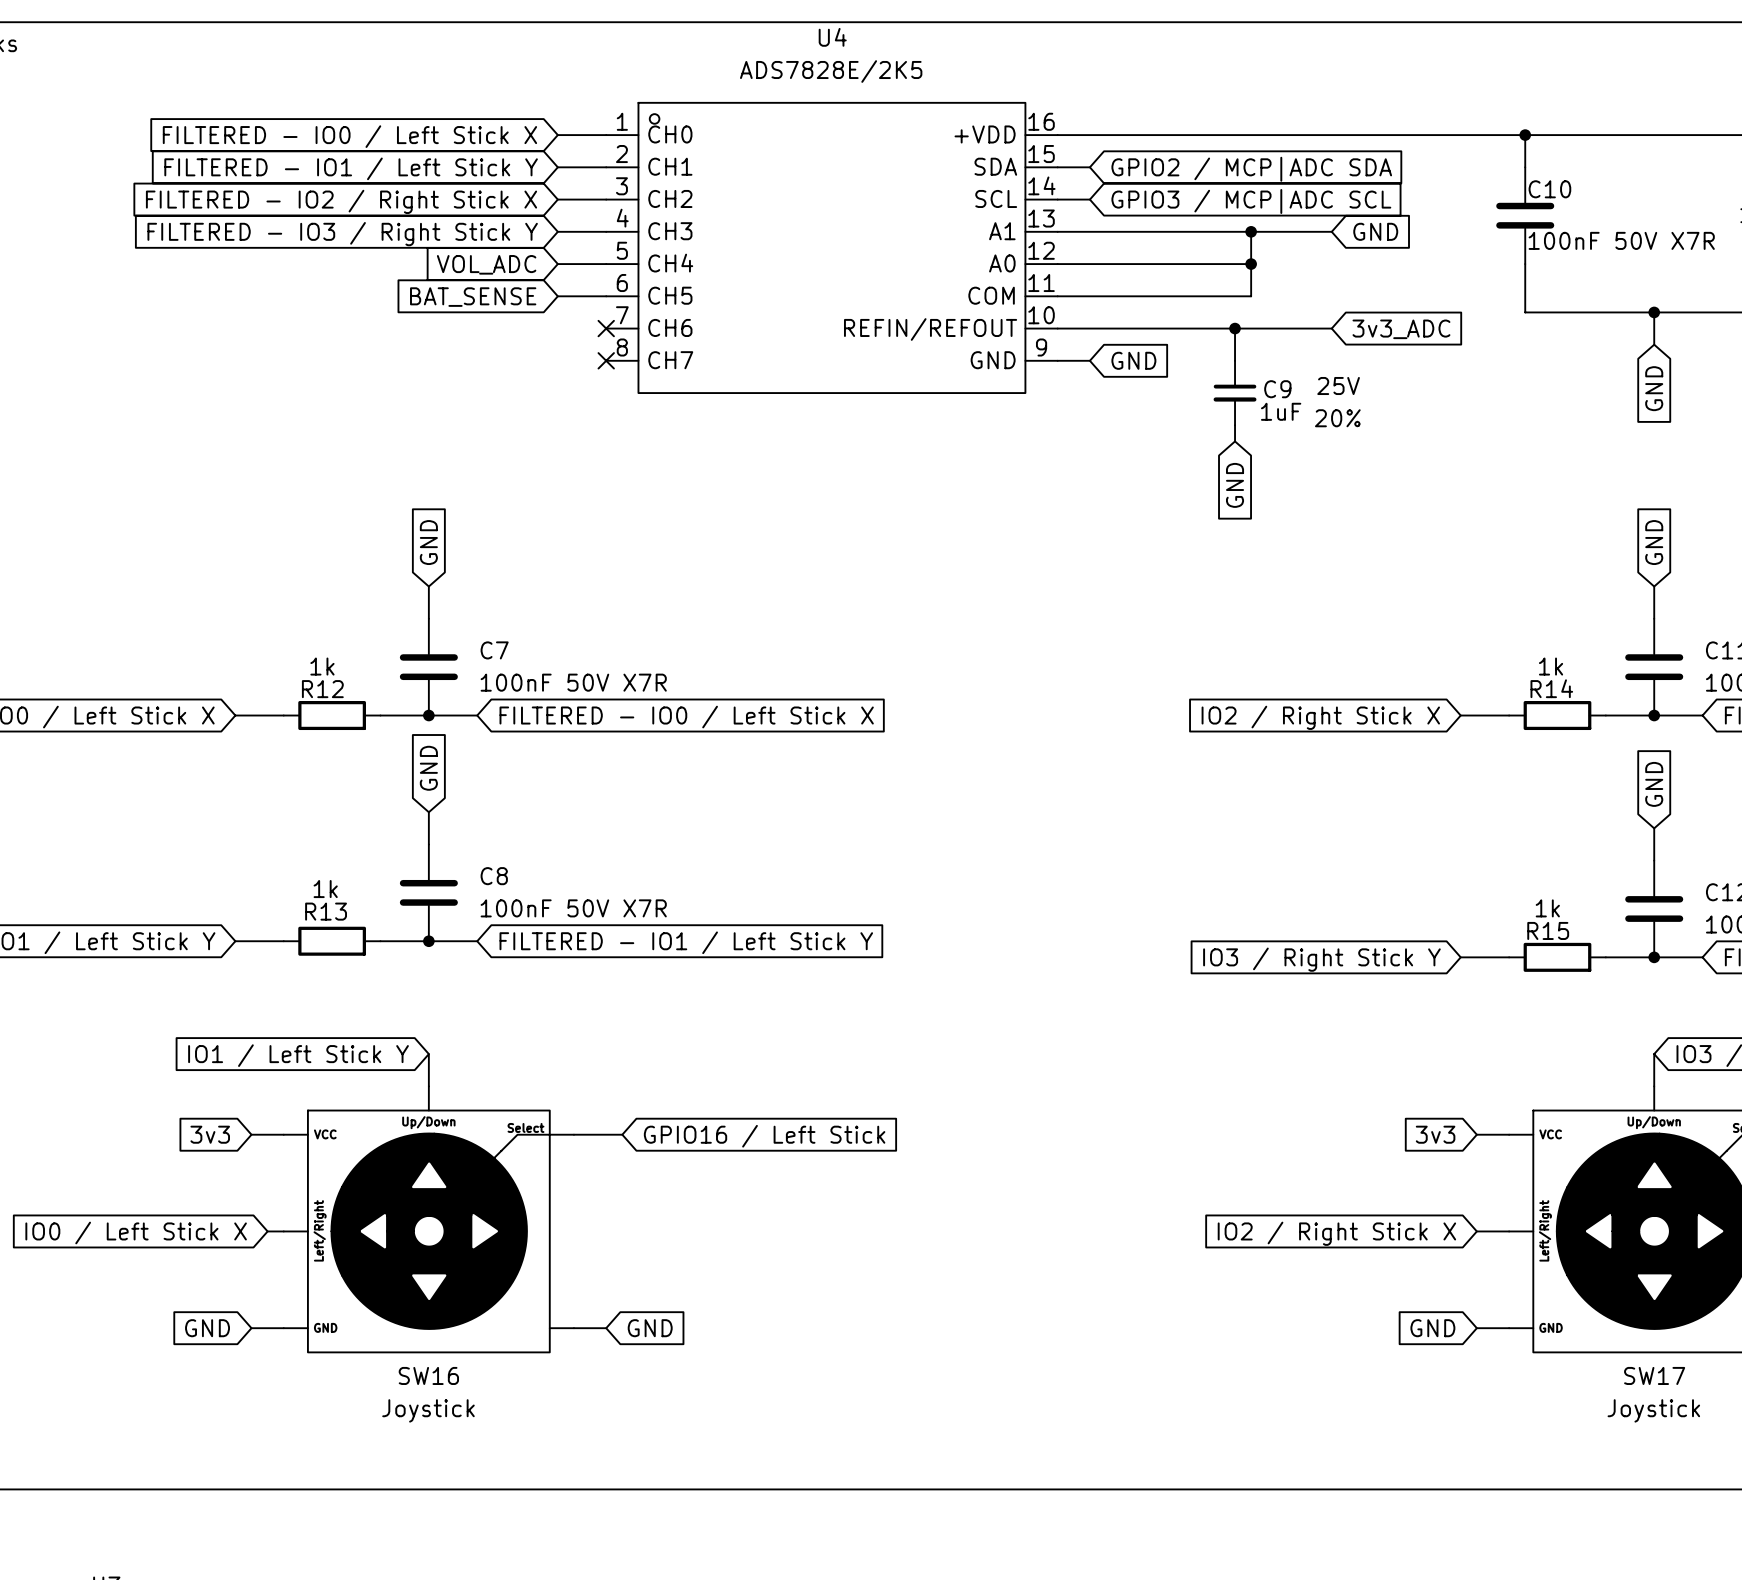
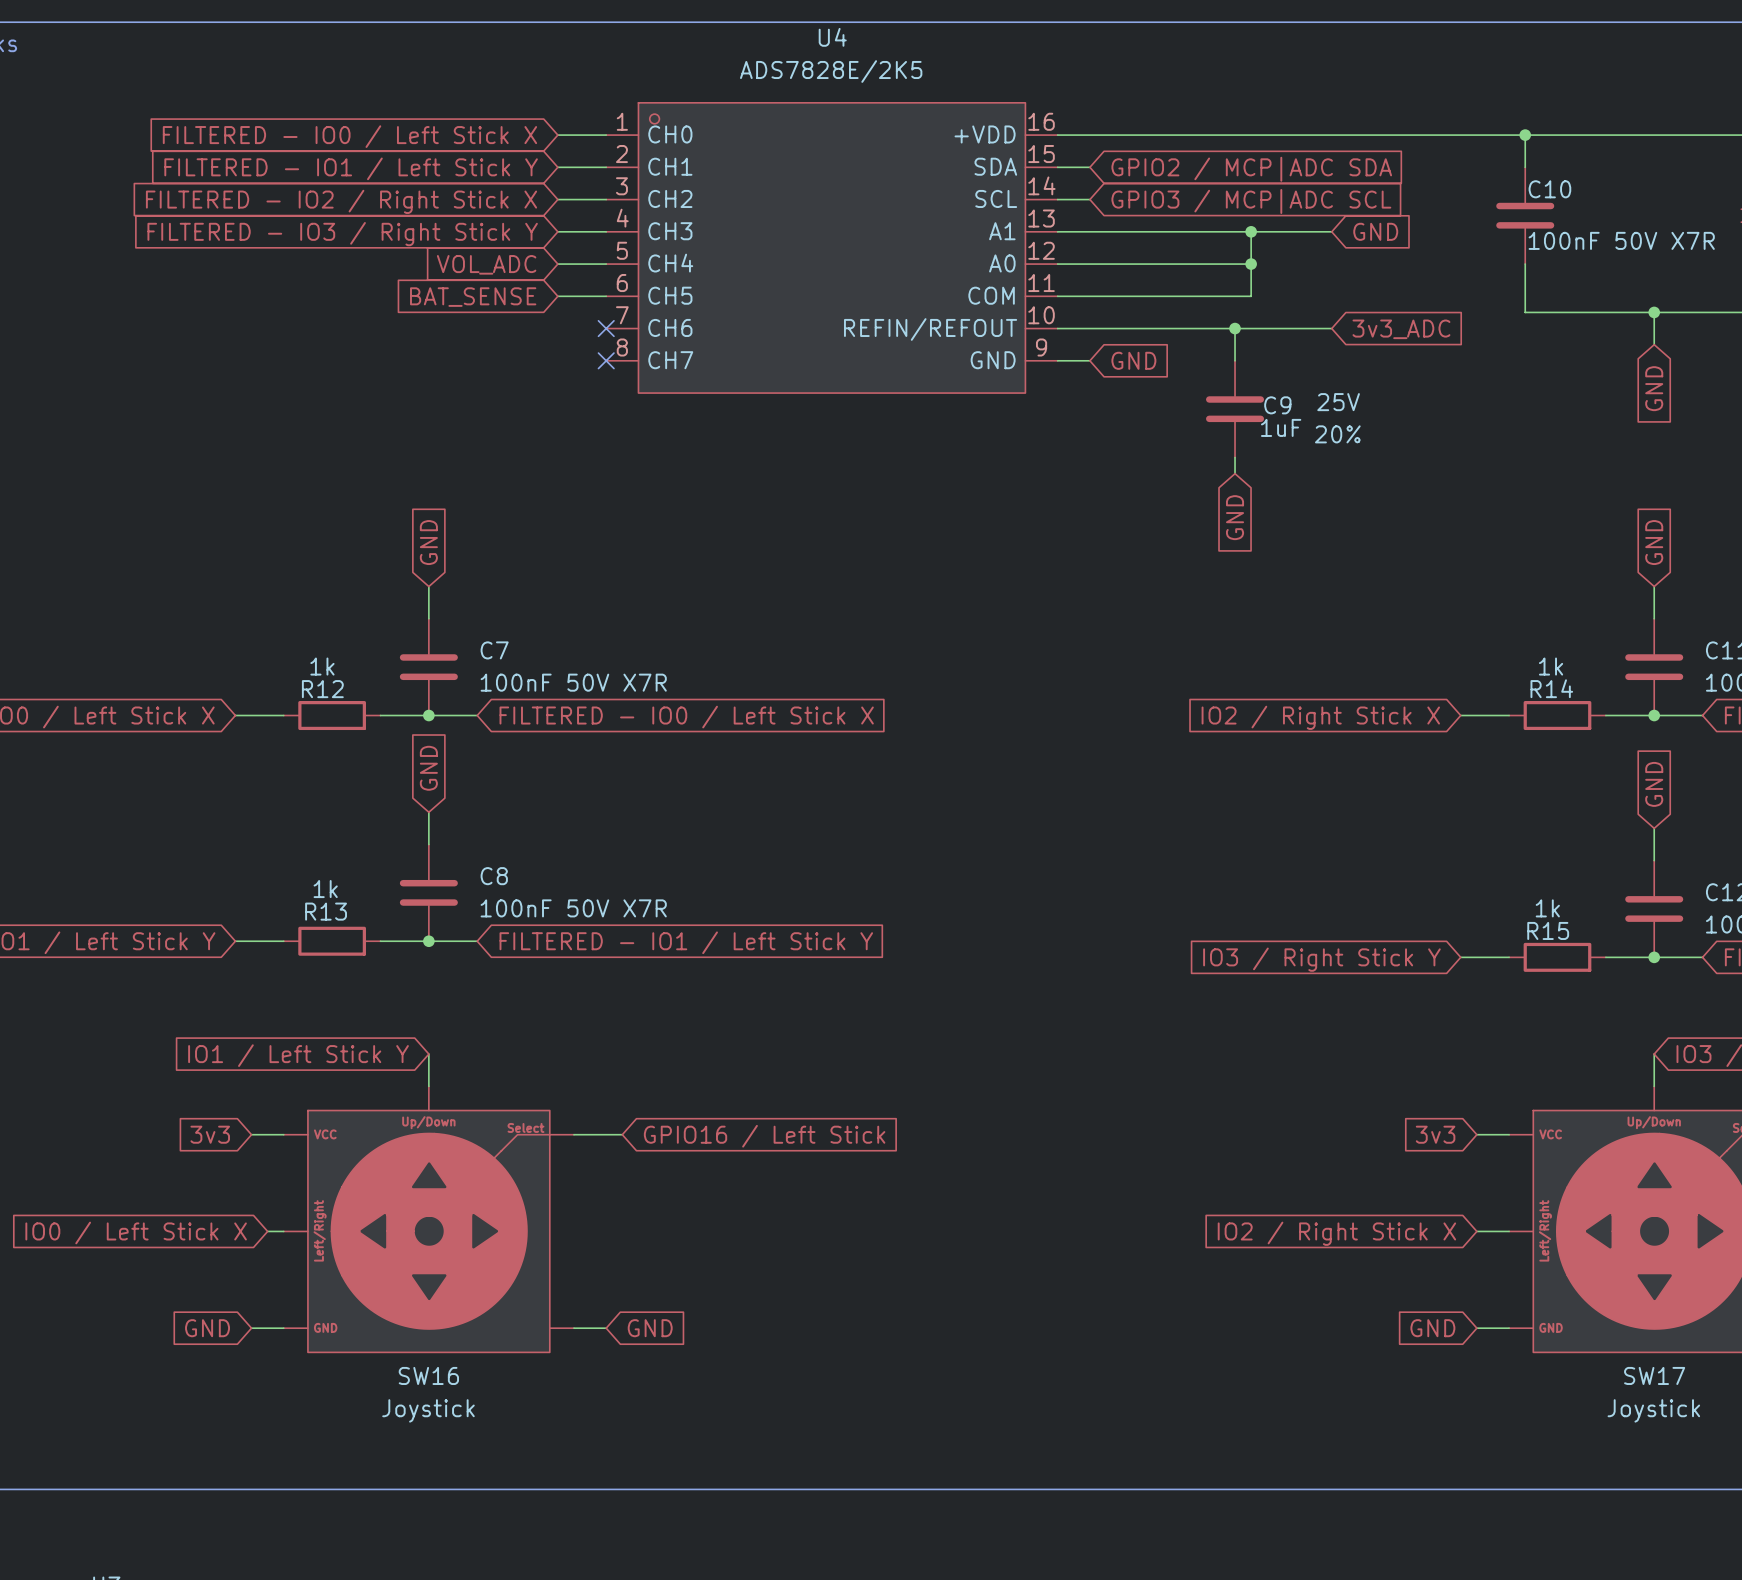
C9 symbol: [1213, 360, 1257, 426] -> [1206, 360, 1265, 458]
global label position: GND (1235, 485) -> GND (1235, 517)

